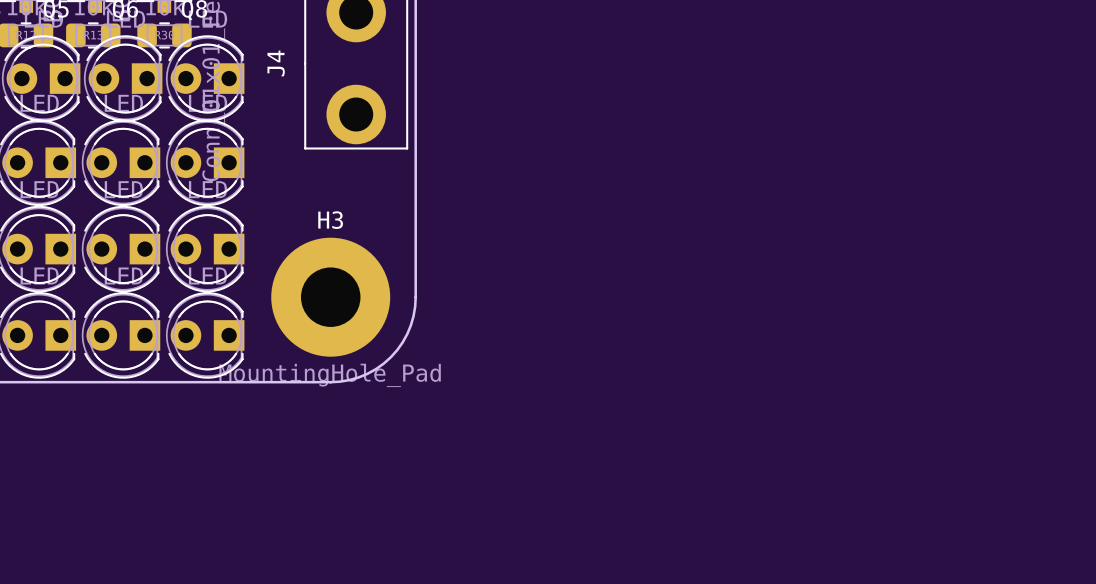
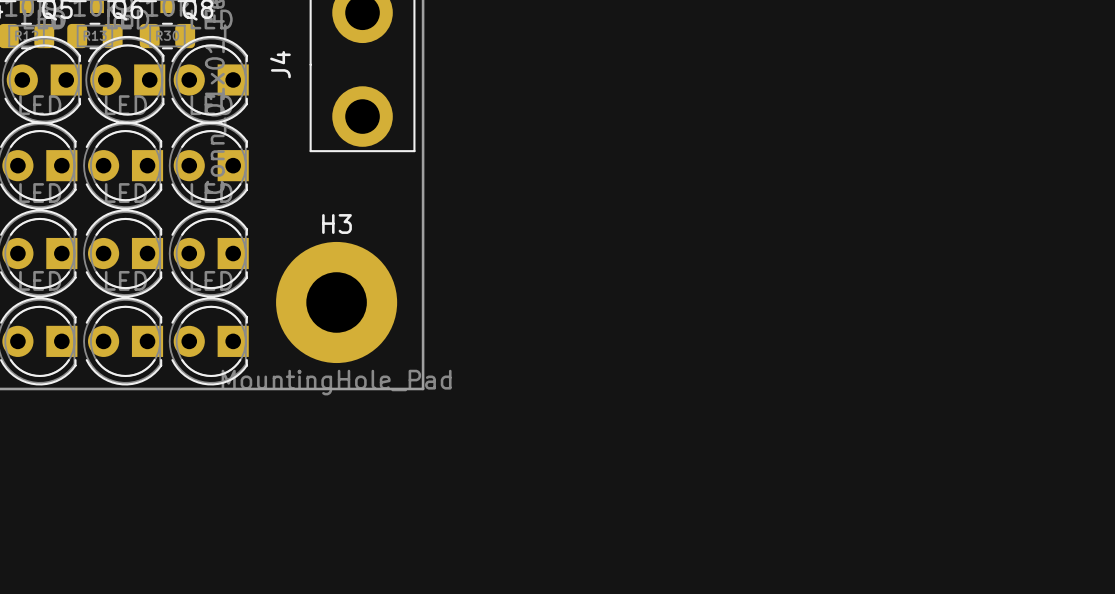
board edge: (415, 297) (413, 316) (407, 334) (390, 357) (375, 369) (358, 377) (330, 382) -> (423, 302) (423, 388) (336, 388)

